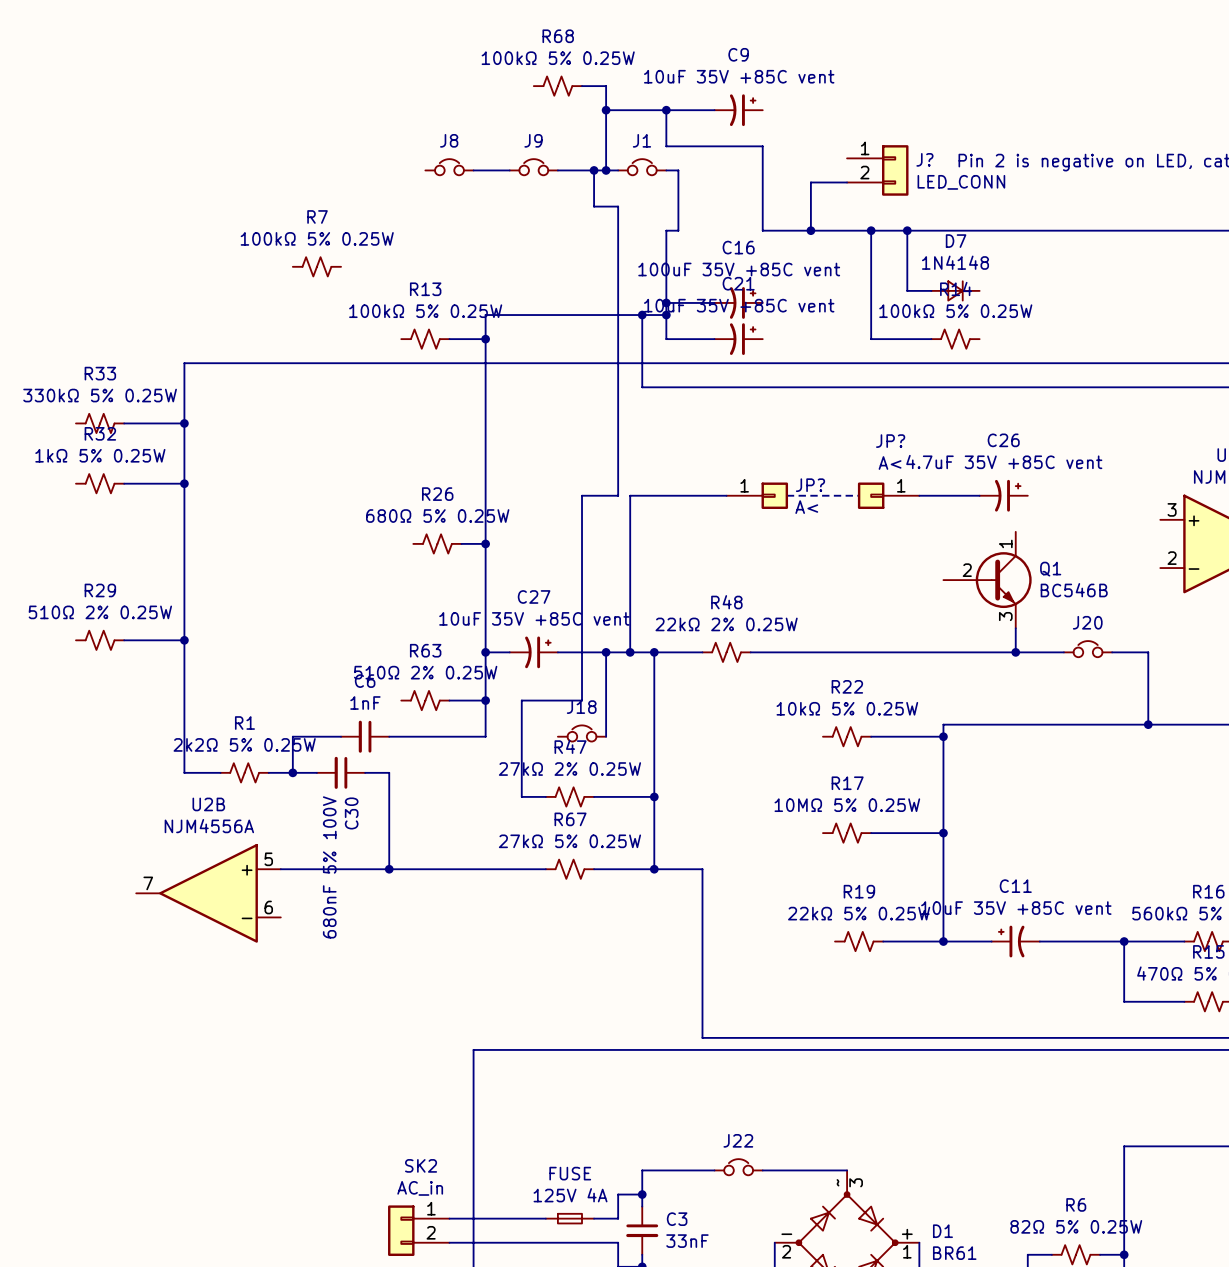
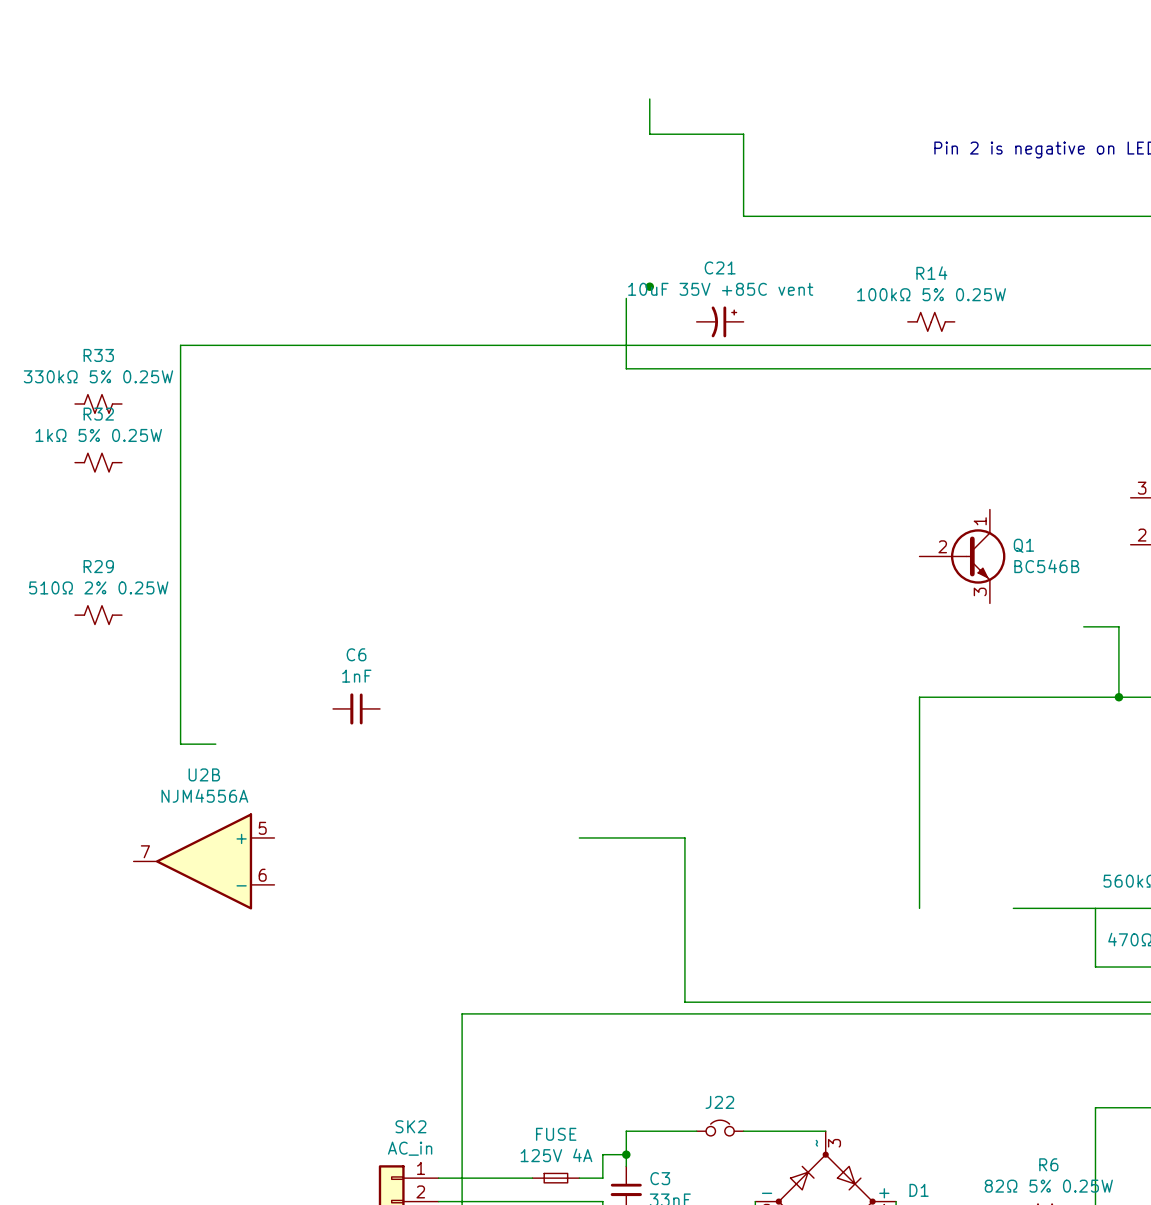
R68: 100kΩ 5% 0.25W (557, 86) -> none
wire: (582, 86) (606, 86) (606, 170) -> none
wire: (606, 110) (714, 110) -> none
junction: (606, 110) -> none
junction: (666, 110) -> none
C9: 10uF 35V +85C vent (738, 110) -> none
J8: (449, 167) -> none
J9: (533, 167) -> none
J1: (642, 167) -> none
wire: (473, 170) (509, 170) -> none
wire: (557, 170) (618, 170) -> none
wire: (594, 170) (594, 206) (618, 206) (618, 495) (582, 495) (582, 700) (521, 700) (521, 796) (545, 796) -> none
junction: (594, 170) -> none
junction: (606, 170) -> none
wire: (666, 170) (678, 170) (678, 230) (666, 230) (666, 339) (714, 339) -> none
J?: LED_CONN (877, 170) -> none
wire: (847, 182) (810, 182) (810, 230) -> none
junction: (810, 230) -> none
wire: (871, 230) (871, 339) (931, 339) -> none
junction: (871, 230) -> none
wire: (907, 230) (907, 290) (931, 290) -> none
junction: (907, 230) -> none
R7: 100kΩ 5% 0.25W (316, 266) -> none
D7: 1N4148 (955, 290) -> none
wire: (666, 302) (714, 302) -> none
C16: 100uF 35V +85C vent (738, 302) -> none
junction: (642, 315) -> none
wire: (666, 315) (485, 315) (485, 736) (389, 736) -> none
junction: (666, 315) -> none
R13: 100kΩ 5% 0.25W (425, 339) -> none
wire: (449, 339) (485, 339) -> none
junction: (485, 339) -> none
wire: (124, 423) (184, 423) -> none
junction: (184, 423) -> none
wire: (124, 483) (184, 483) -> none
junction: (184, 483) -> none
wire: (726, 495) (630, 495) (630, 652) -> none
JP?: A< (757, 495) -> none
line: (786, 495) (859, 495) -> none
JP?: A< (888, 495) -> none
wire: (919, 495) (979, 495) -> none
C26: 4.7uF 35V +85C vent (1003, 495) -> none
R26: 680Ω 5% 0.25W (437, 543) -> none
wire: (461, 543) (485, 543) -> none
junction: (485, 543) -> none
wire: (1015, 628) (1015, 652) -> none
wire: (124, 640) (184, 640) -> none
junction: (184, 640) -> none
J20: (1088, 649) -> none
wire: (485, 652) (509, 652) -> none
junction: (485, 652) -> none
C27: 10uF 35V +85C vent (533, 652) -> none
wire: (557, 652) (702, 652) -> none
wire: (606, 652) (606, 736) -> none
junction: (606, 652) -> none
junction: (630, 652) -> none
wire: (654, 652) (654, 869) -> none
junction: (654, 652) -> none
R48: 22kΩ 2% 0.25W (726, 652) -> none
wire: (750, 652) (1063, 652) -> none
junction: (1015, 652) -> none
R63: 510Ω 2% 0.25W (425, 700) -> none
wire: (449, 700) (485, 700) -> none
junction: (485, 700) -> none
J18: (582, 733) -> none
wire: (341, 736) (292, 736) (292, 772) -> none
R22: 10kΩ 5% 0.25W (847, 736) -> none
wire: (871, 736) (943, 736) -> none
junction: (943, 736) -> none
R1: 2k2Ω 5% 0.25W (244, 772) -> none
wire: (268, 772) (316, 772) -> none
junction: (292, 772) -> none
C30: 680nF 5% 100V (341, 772) -> none
wire: (365, 772) (389, 772) (389, 869) -> none
R47: 27kΩ 2% 0.25W (569, 796) -> none
wire: (594, 796) (654, 796) -> none
junction: (654, 796) -> none
R17: 10MΩ 5% 0.25W (847, 833) -> none
wire: (871, 833) (943, 833) -> none
junction: (943, 833) -> none
wire: (280, 869) (545, 869) -> none
junction: (389, 869) -> none
R67: 27kΩ 5% 0.25W (569, 869) -> none
junction: (654, 869) -> none
R19: 22kΩ 5% 0.25W (859, 941) -> none
wire: (883, 941) (991, 941) -> none
junction: (943, 941) -> none
C11: 10uF 35V +85C vent (1015, 941) -> none
junction: (1124, 941) -> none

